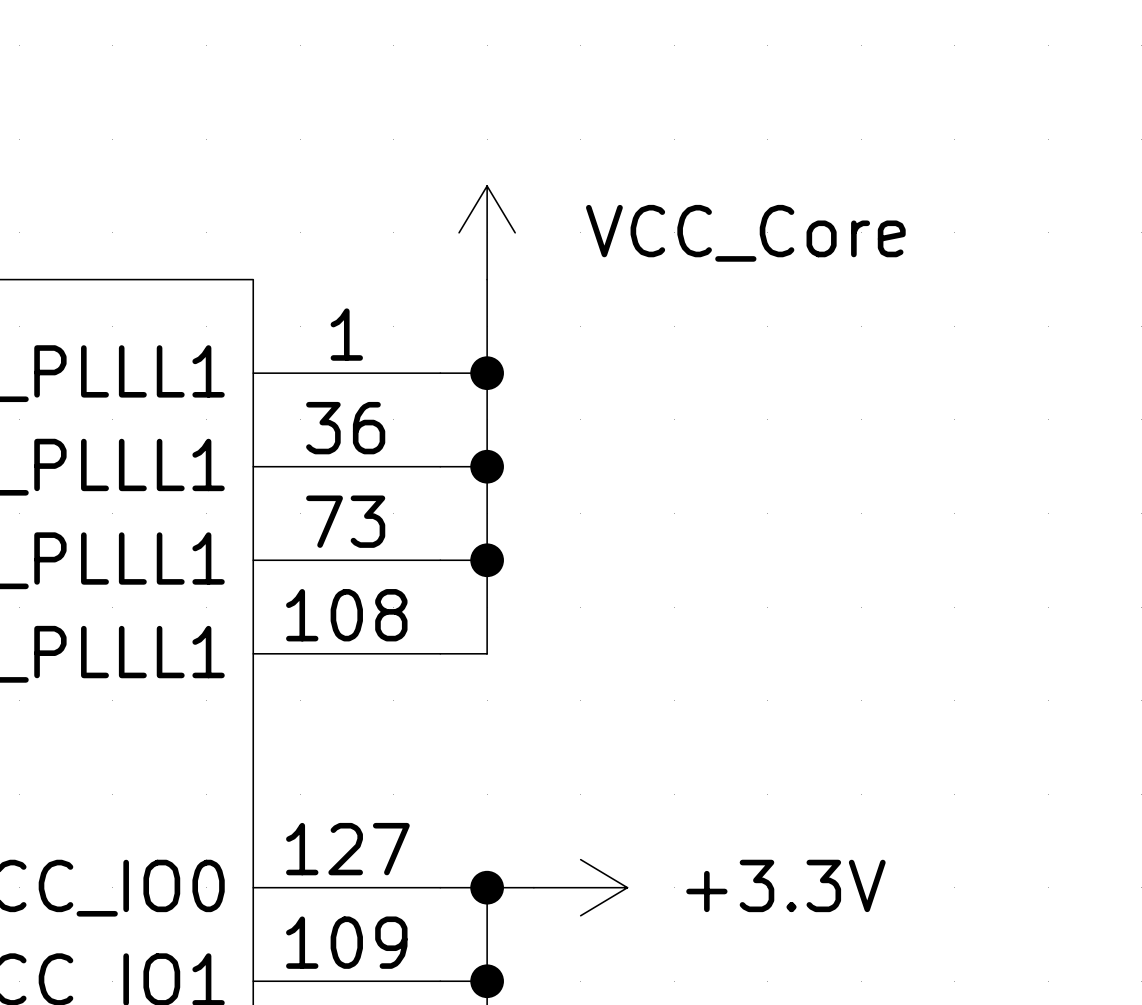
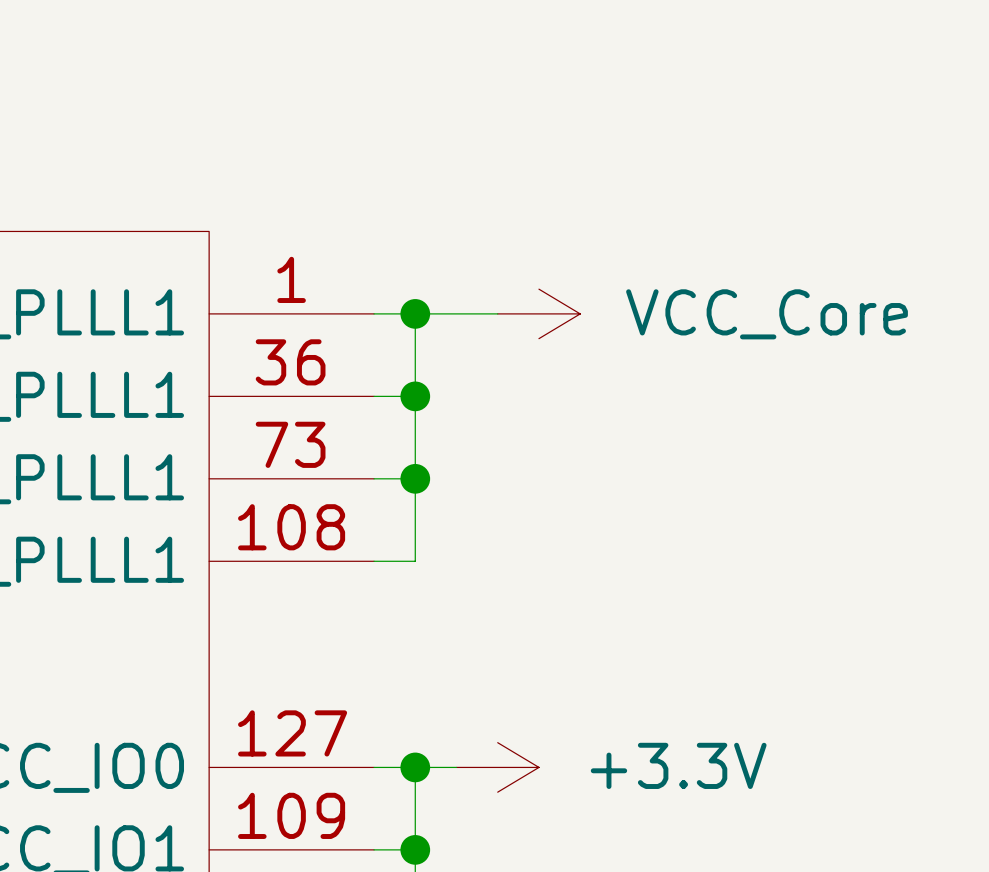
power symbol rotation: 0° (487, 232) -> 90° clockwise (538, 313)
power symbol position: VCC_Core (487, 232) -> VCC_Core (538, 313)
wire: (487, 279) (487, 373) -> (497, 313) (415, 313)

